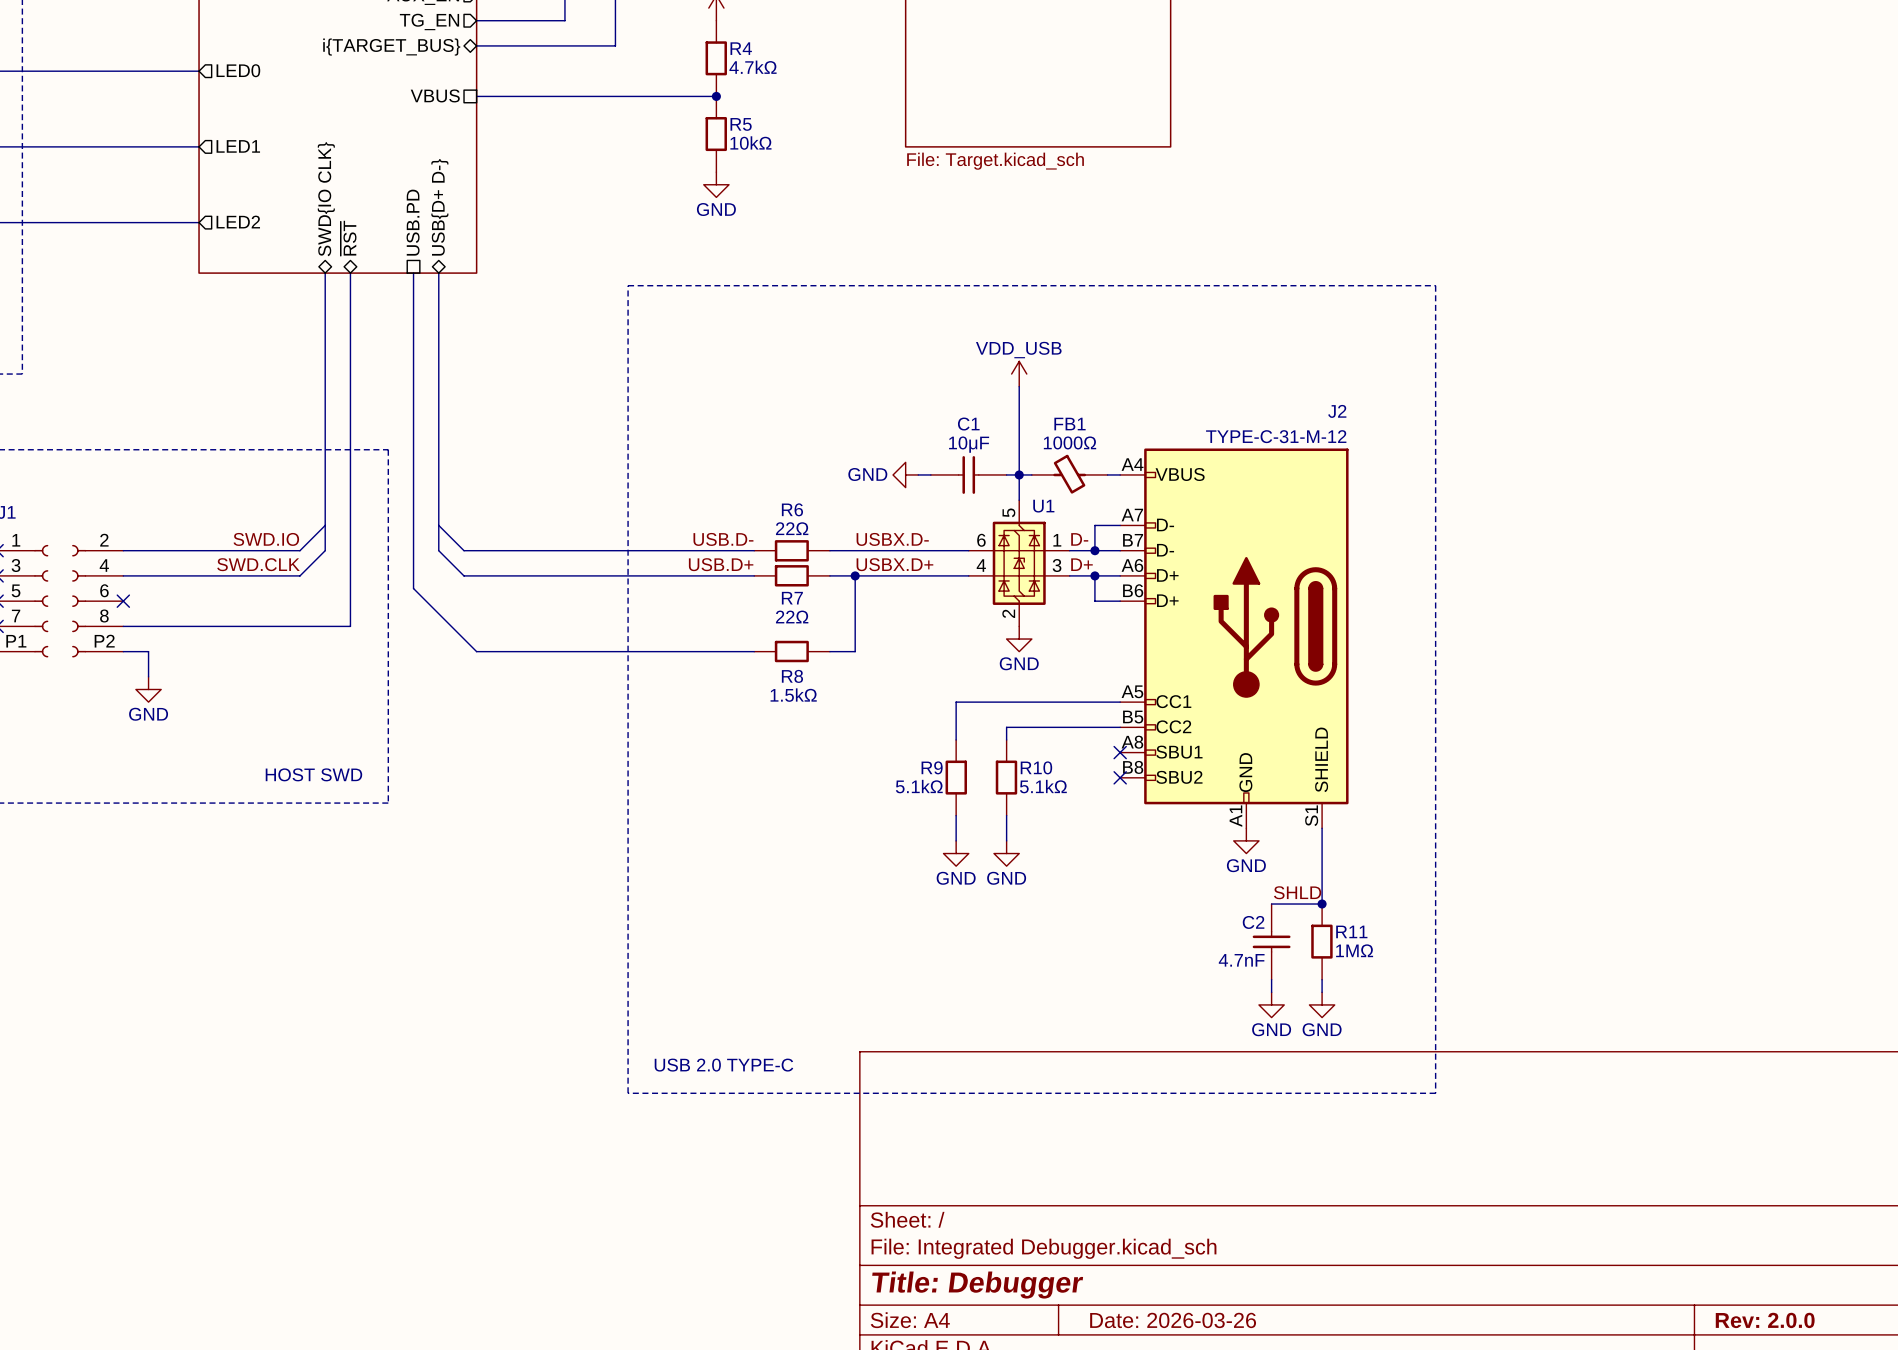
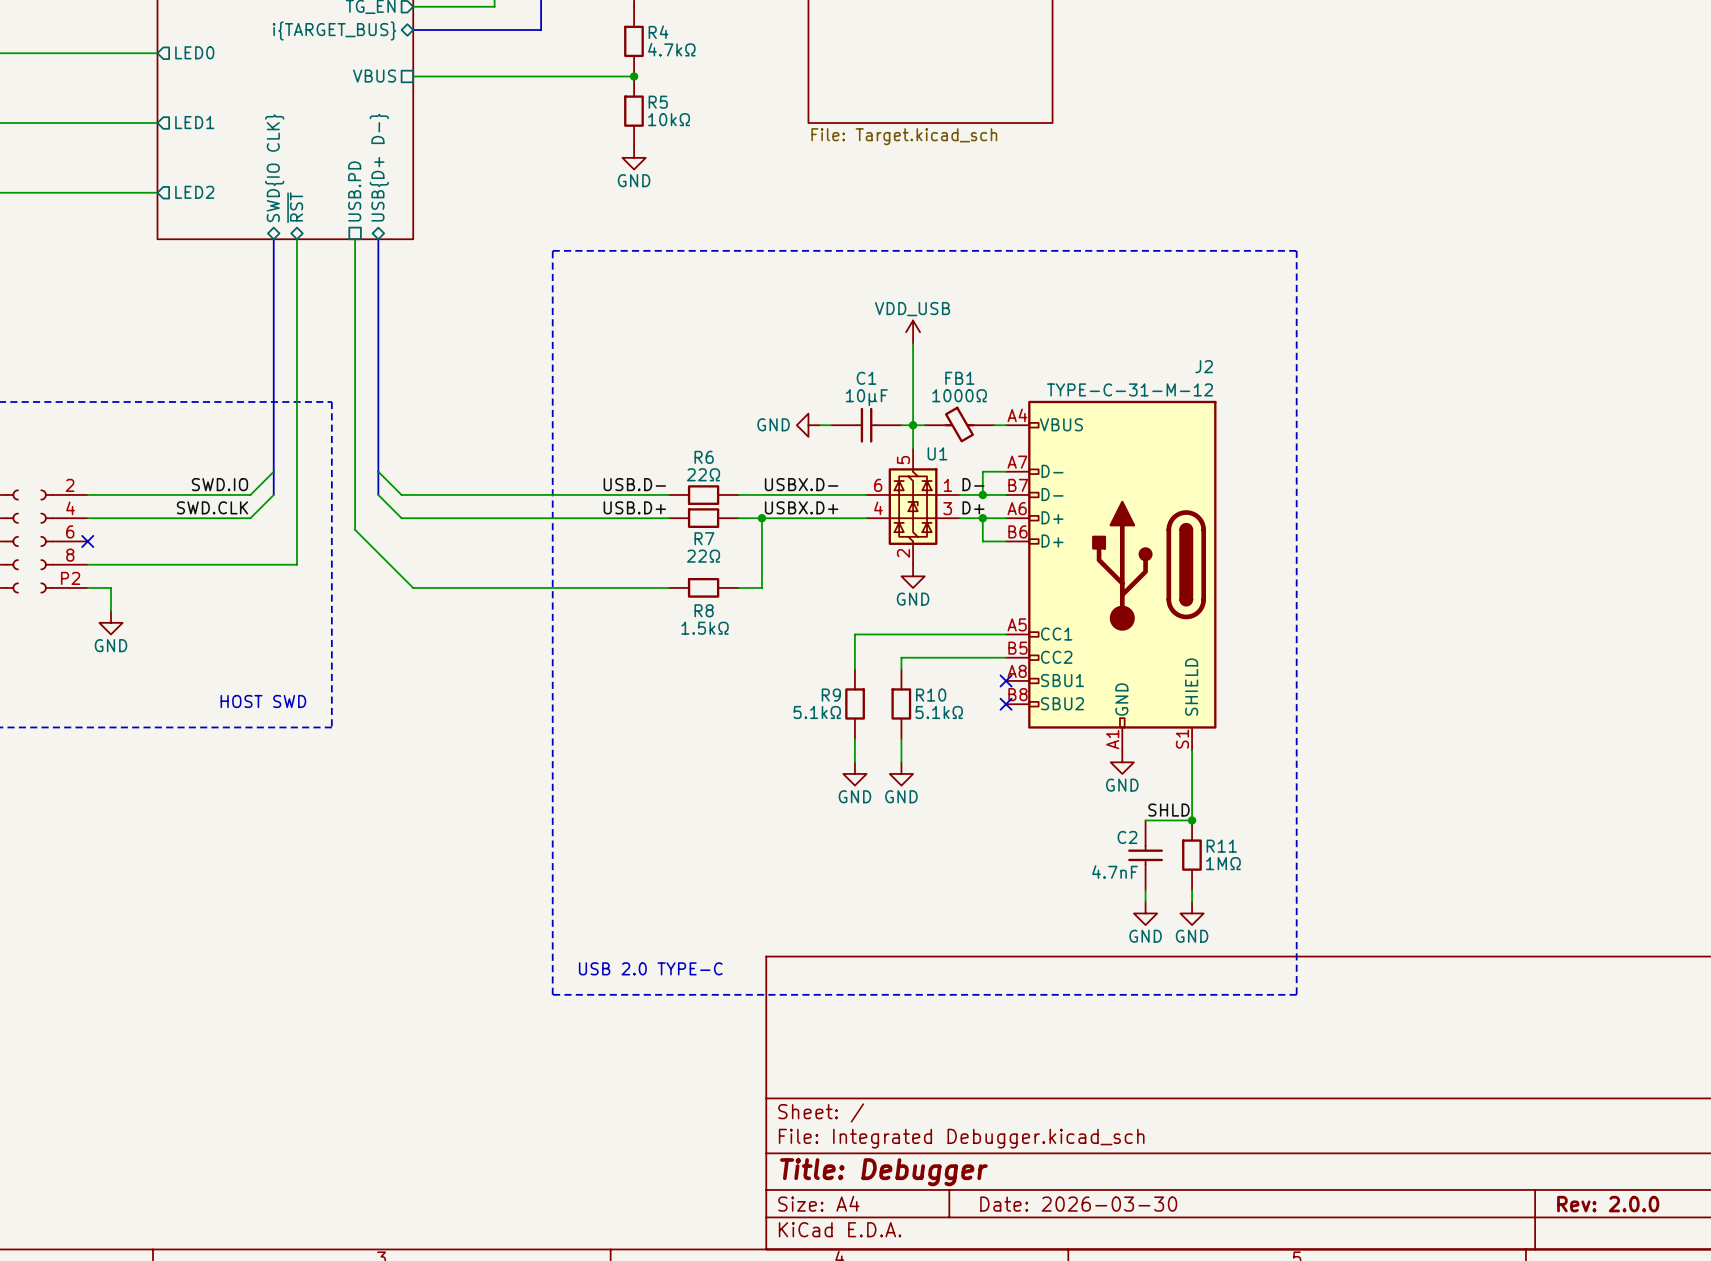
title block: Date: 2026-03-26 (1173, 1320) -> Date: 2026-03-30 (1078, 1204)

